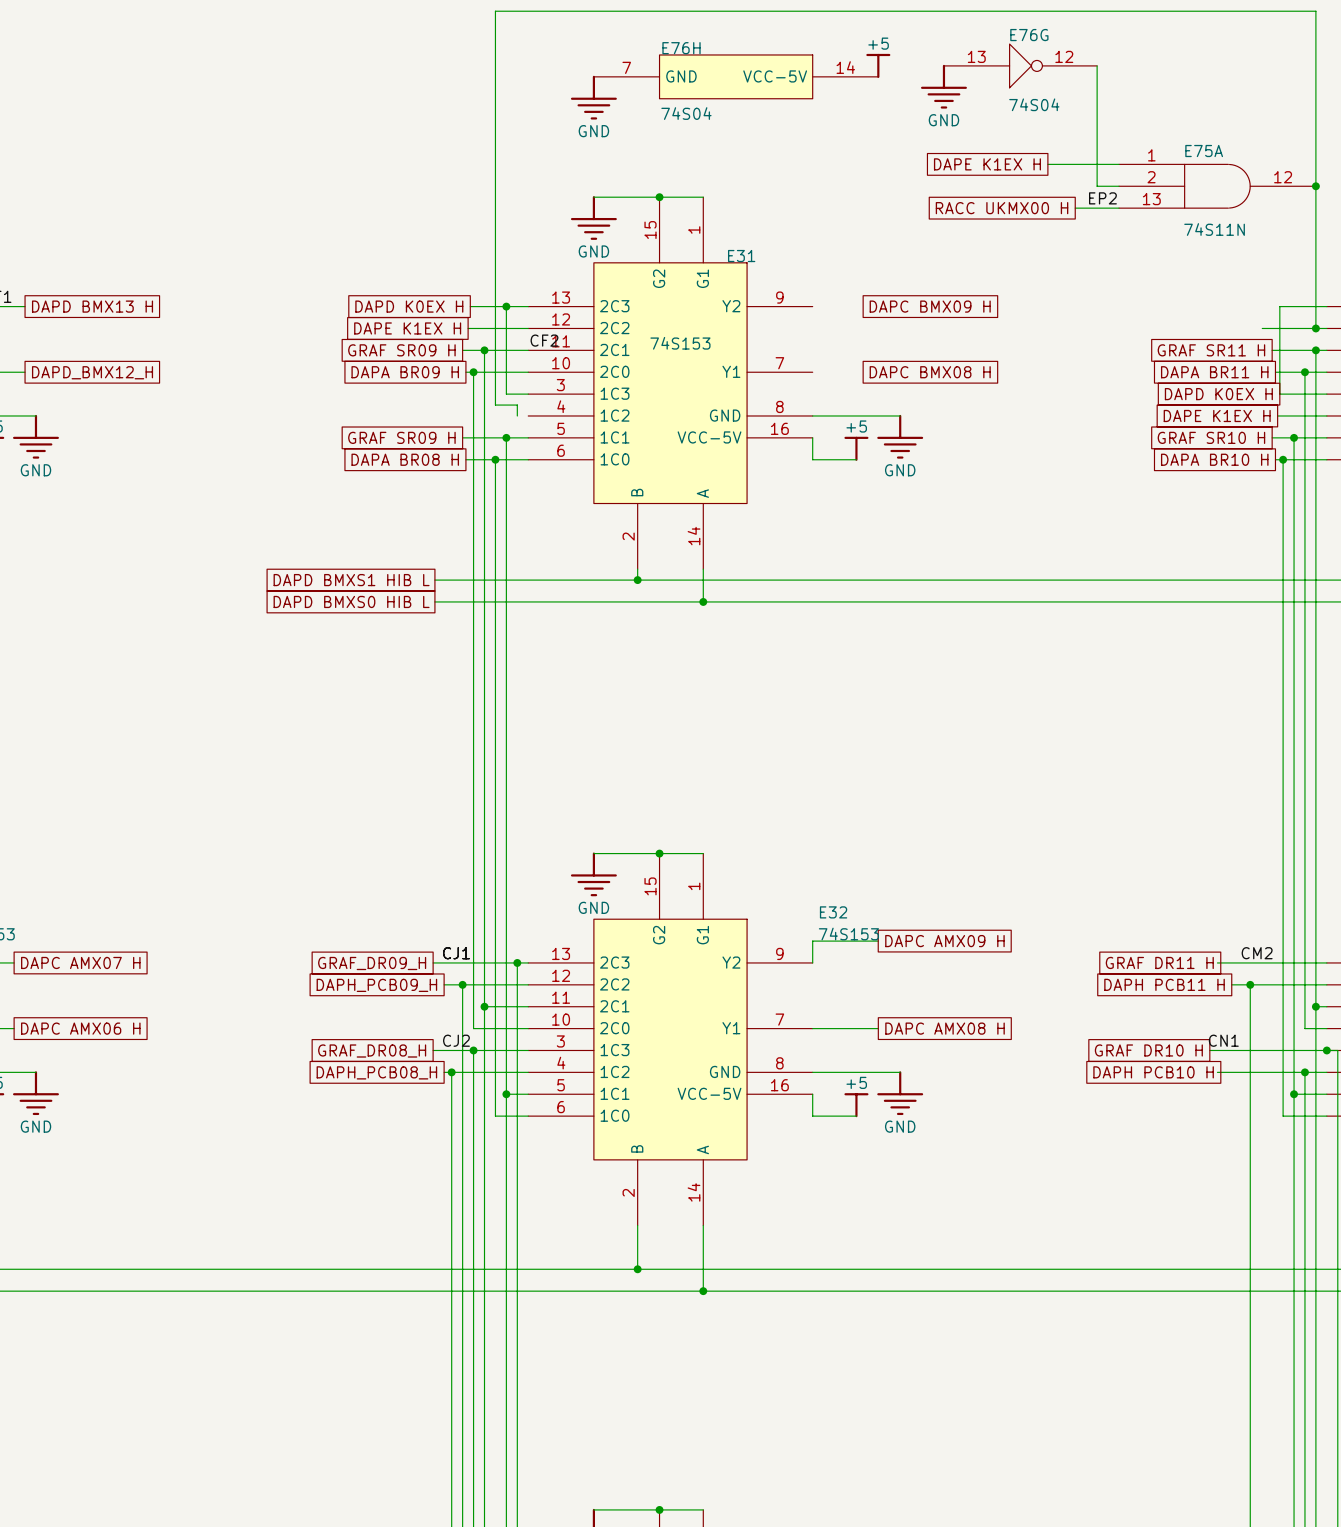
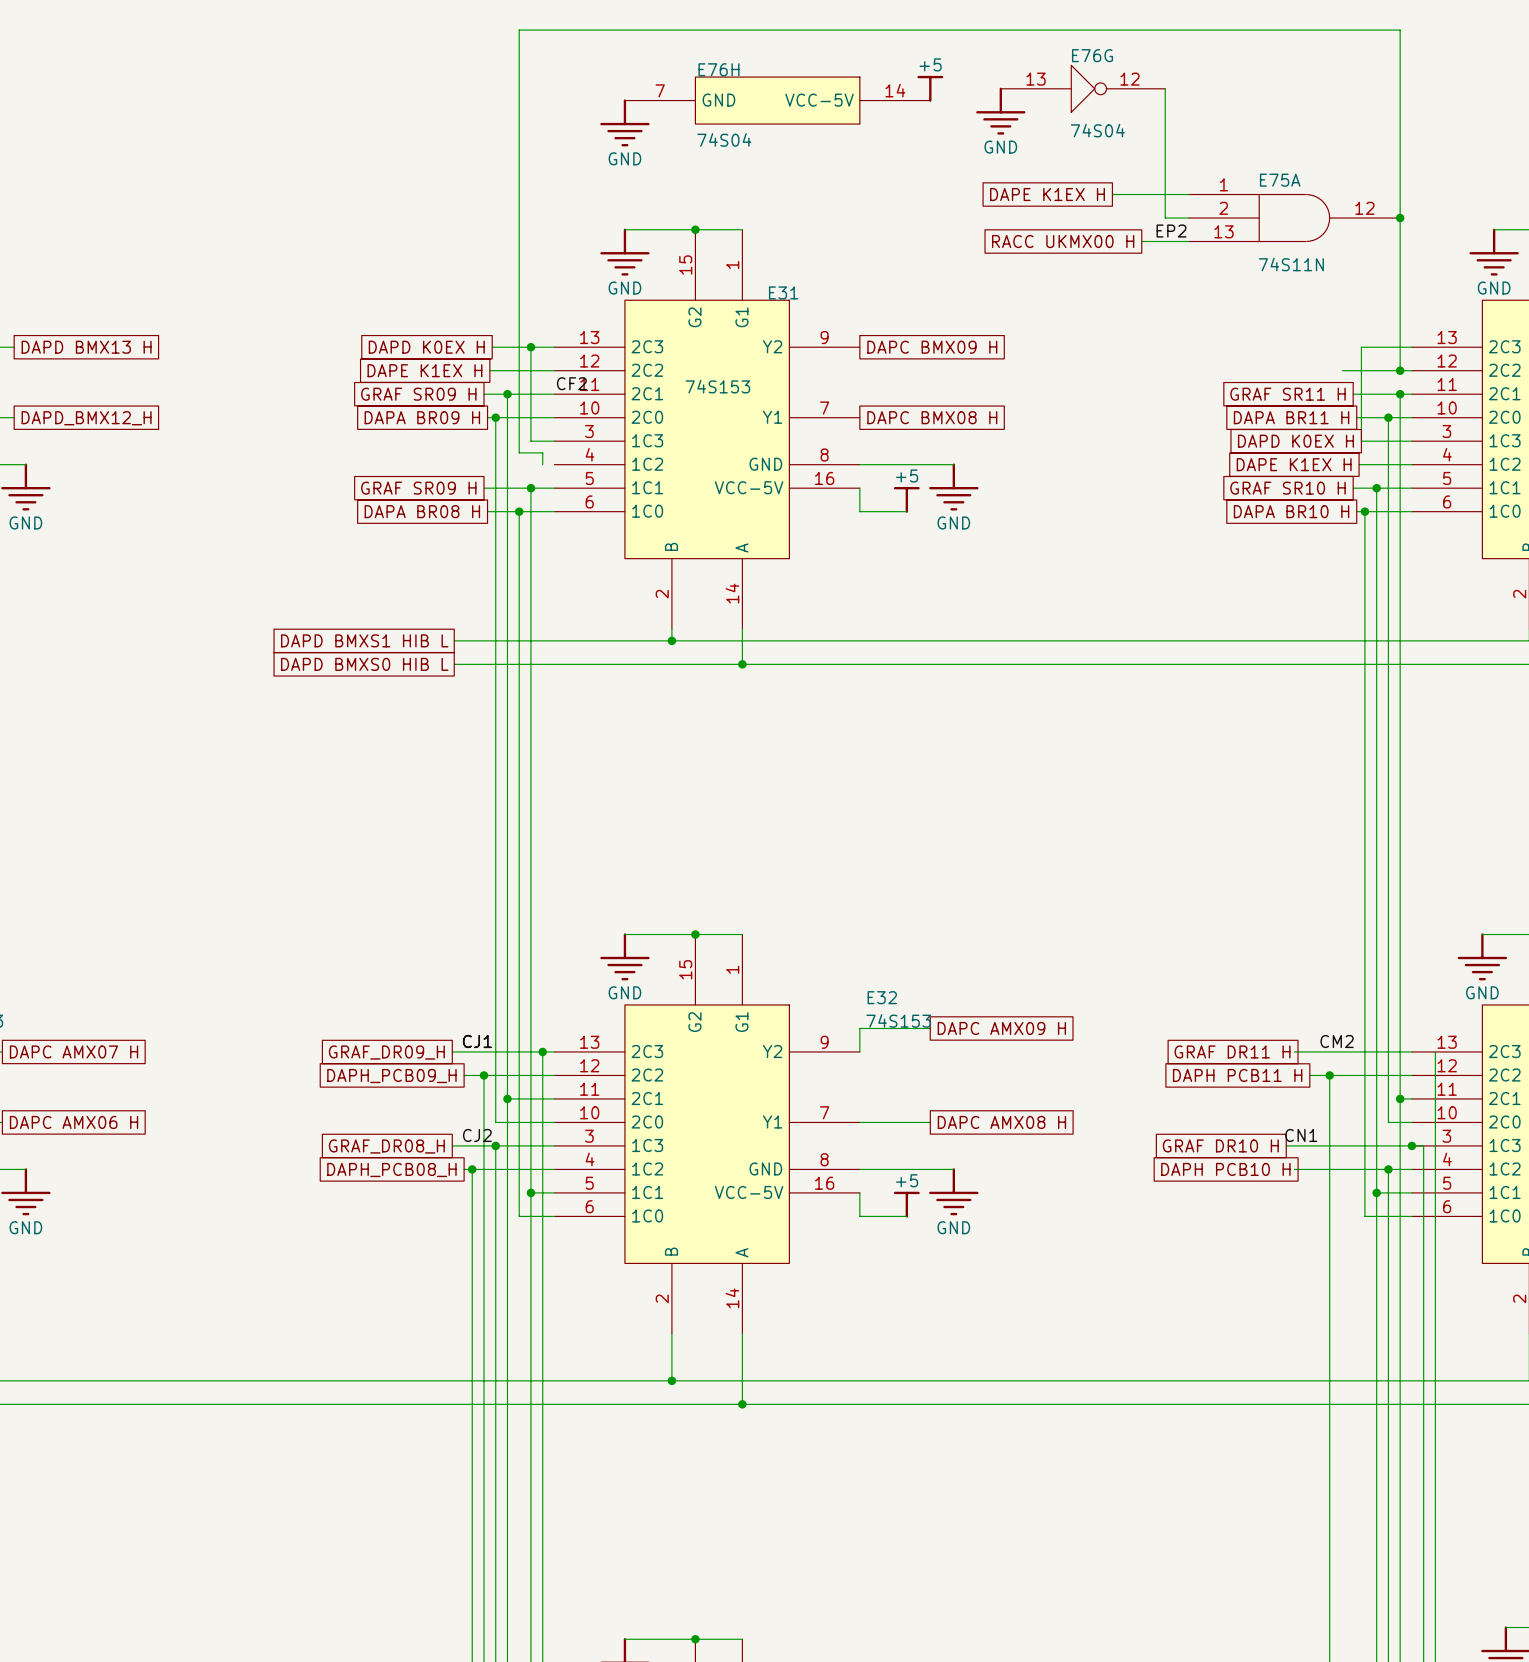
global label rotation: 0° (930, 306) -> 180° (932, 347)
global label rotation: 0° (930, 372) -> 180° (932, 417)

